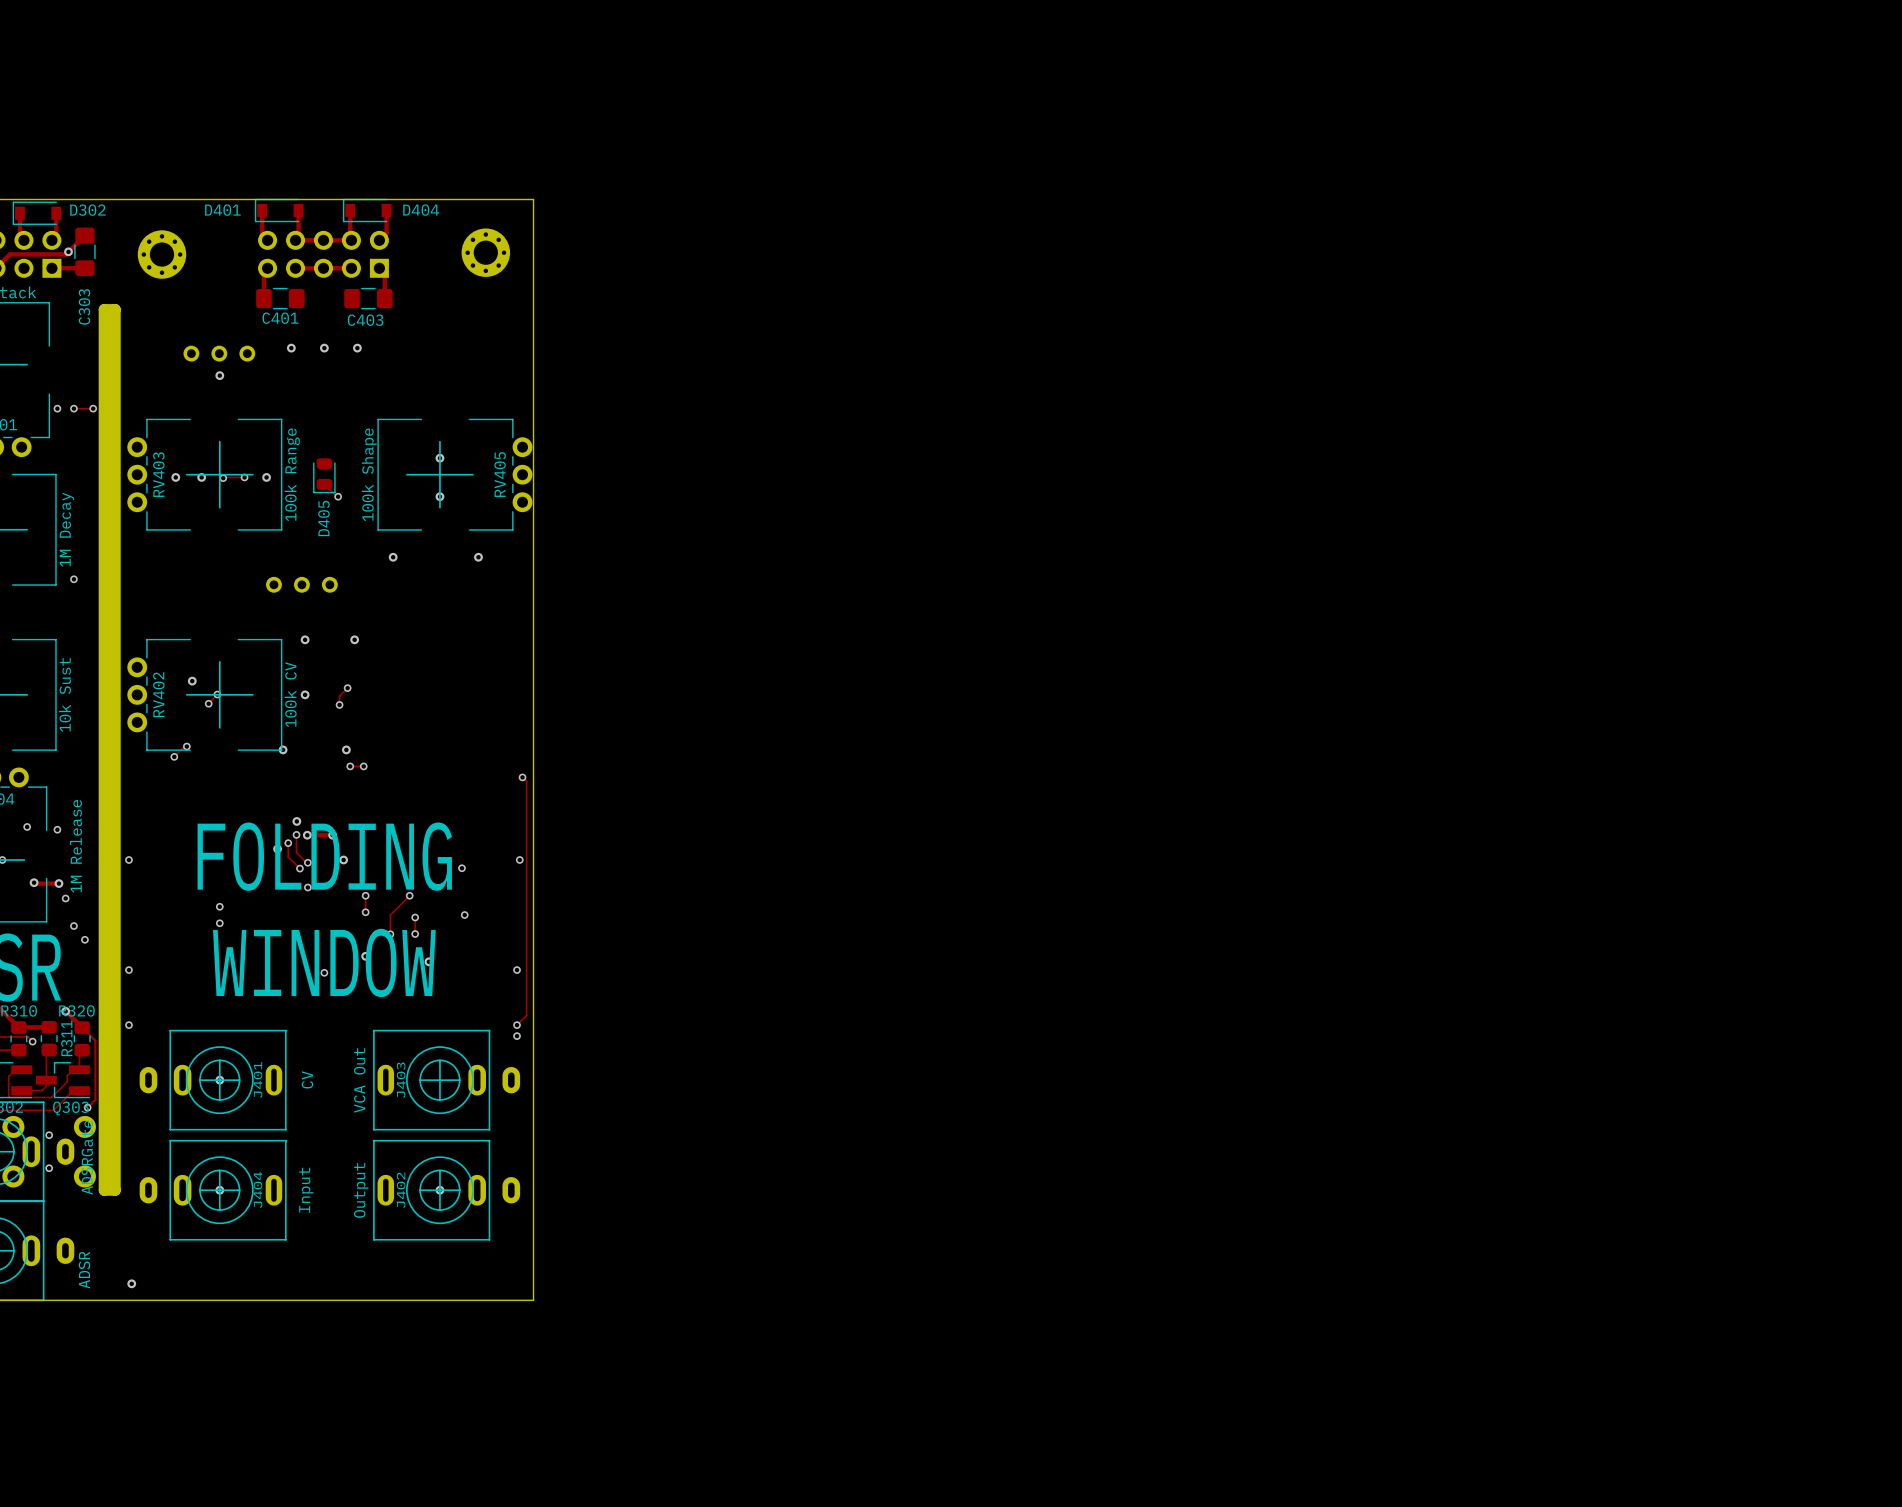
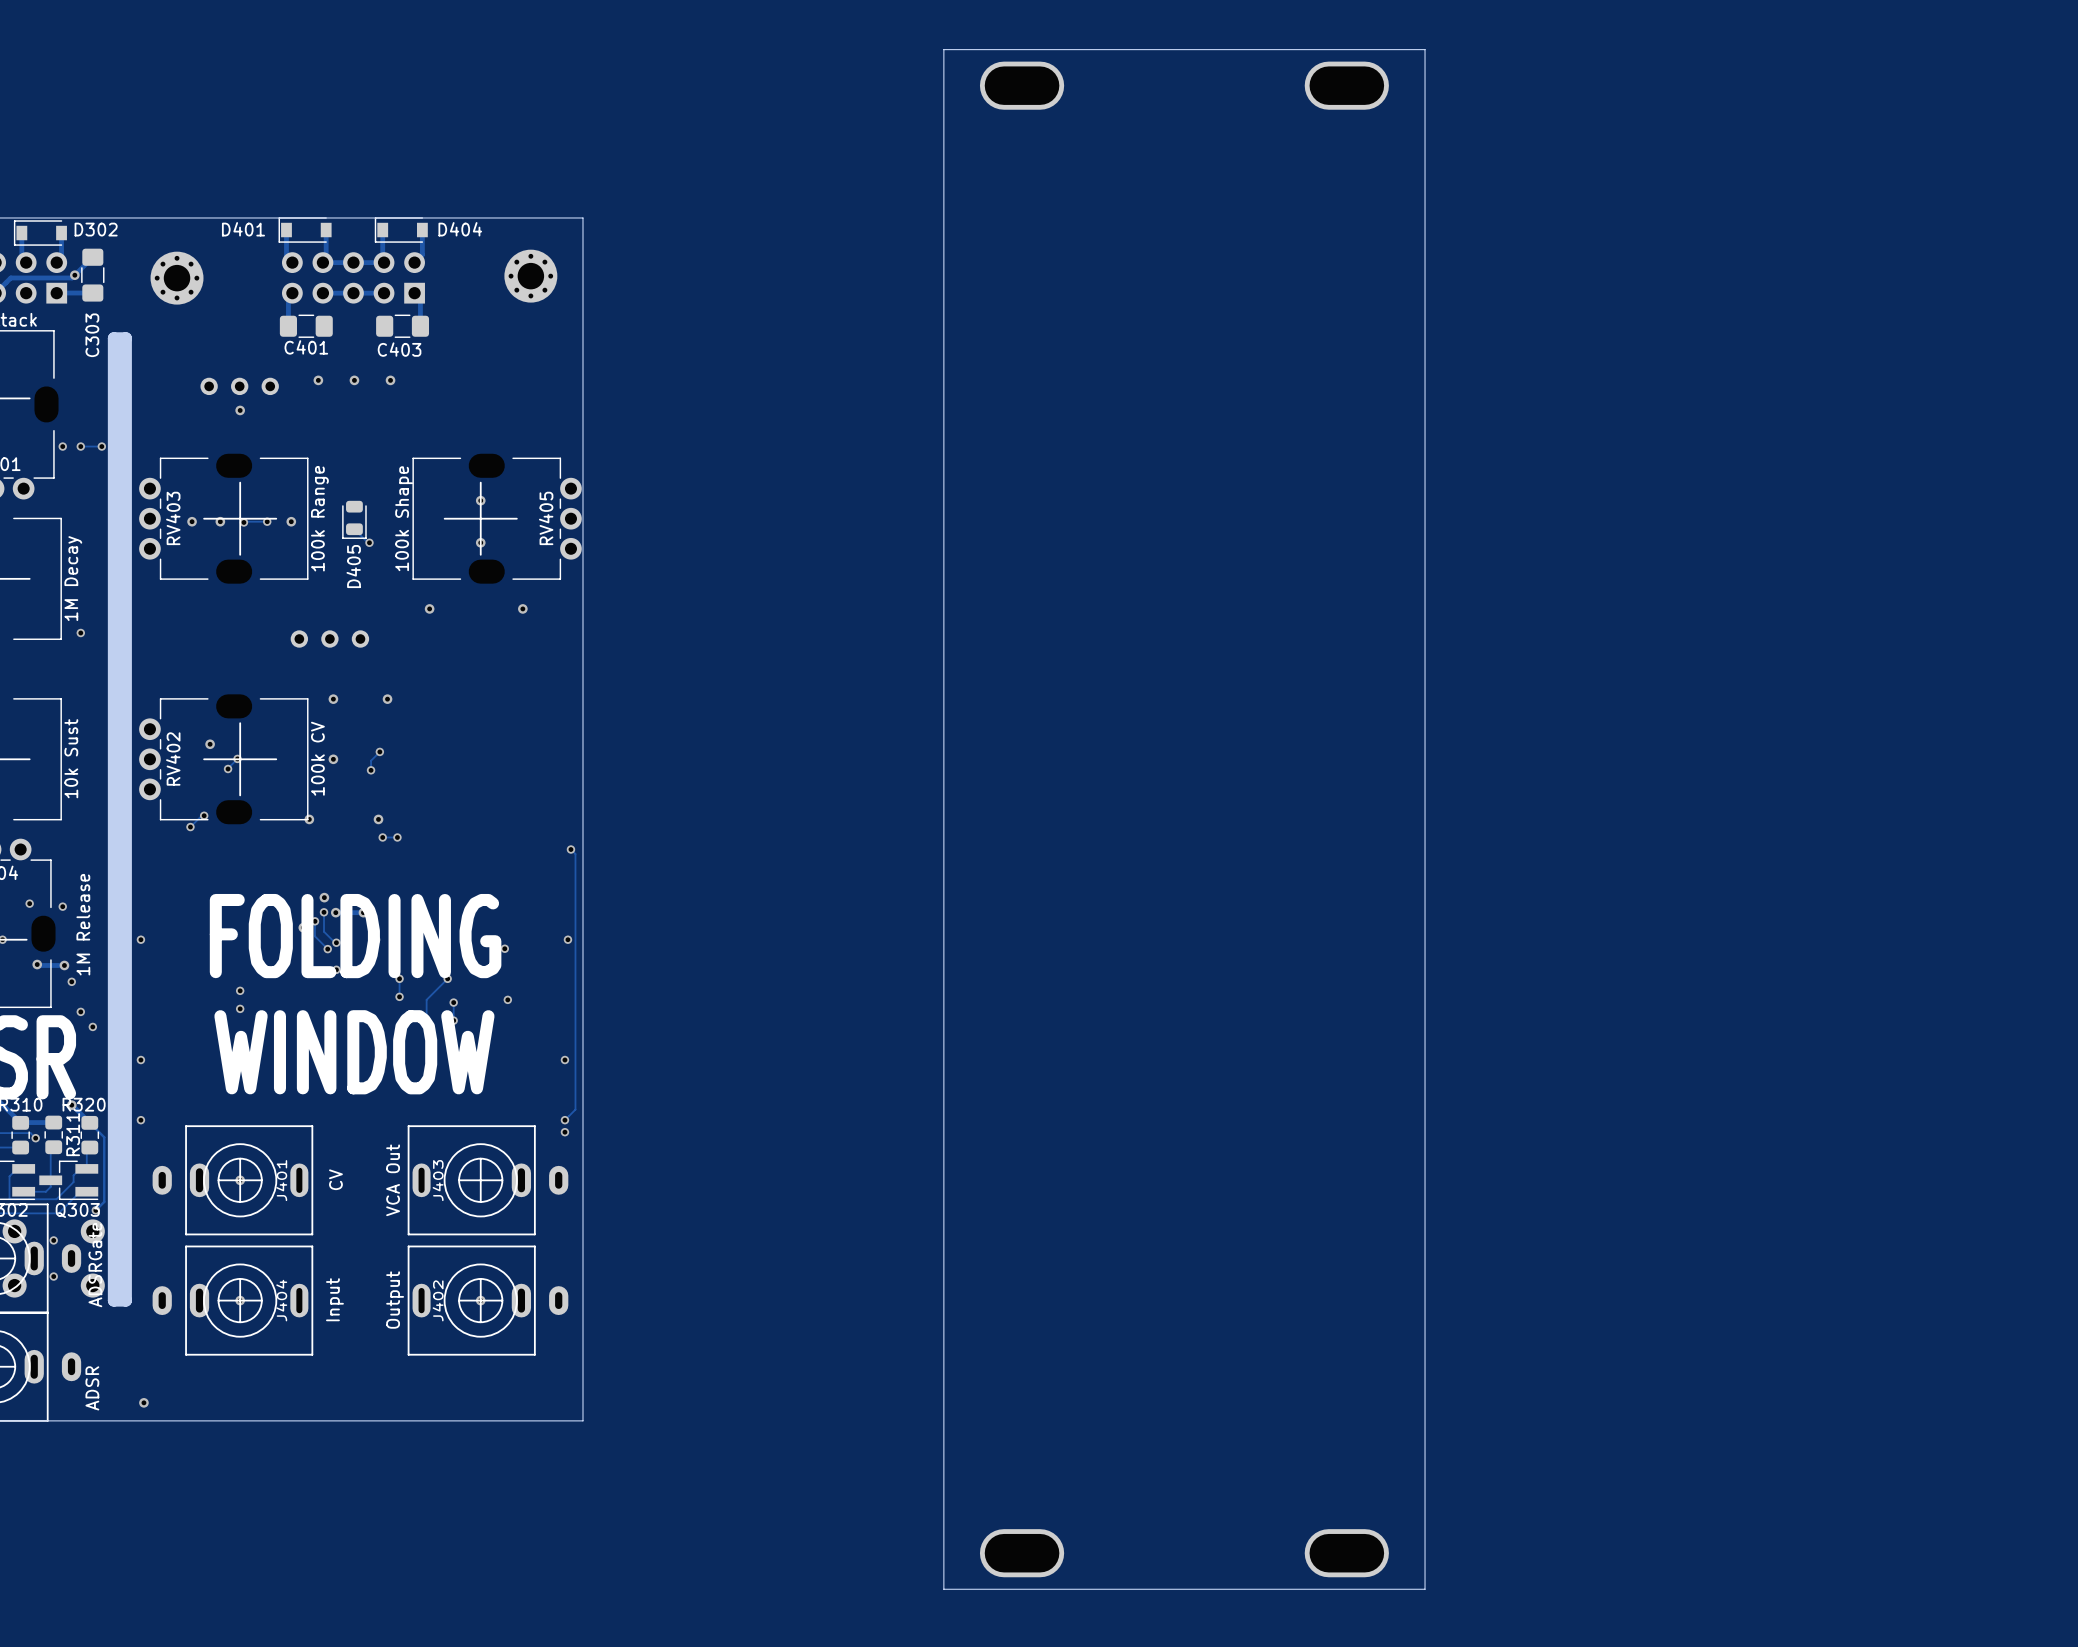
board edge: none -> (943, 49) (943, 1589) (1425, 1589) (1425, 49) (943, 49)
part: none -> (1022, 85)
part: none -> (1346, 85)
part: none -> (1022, 1553)
part: none -> (1346, 1553)

